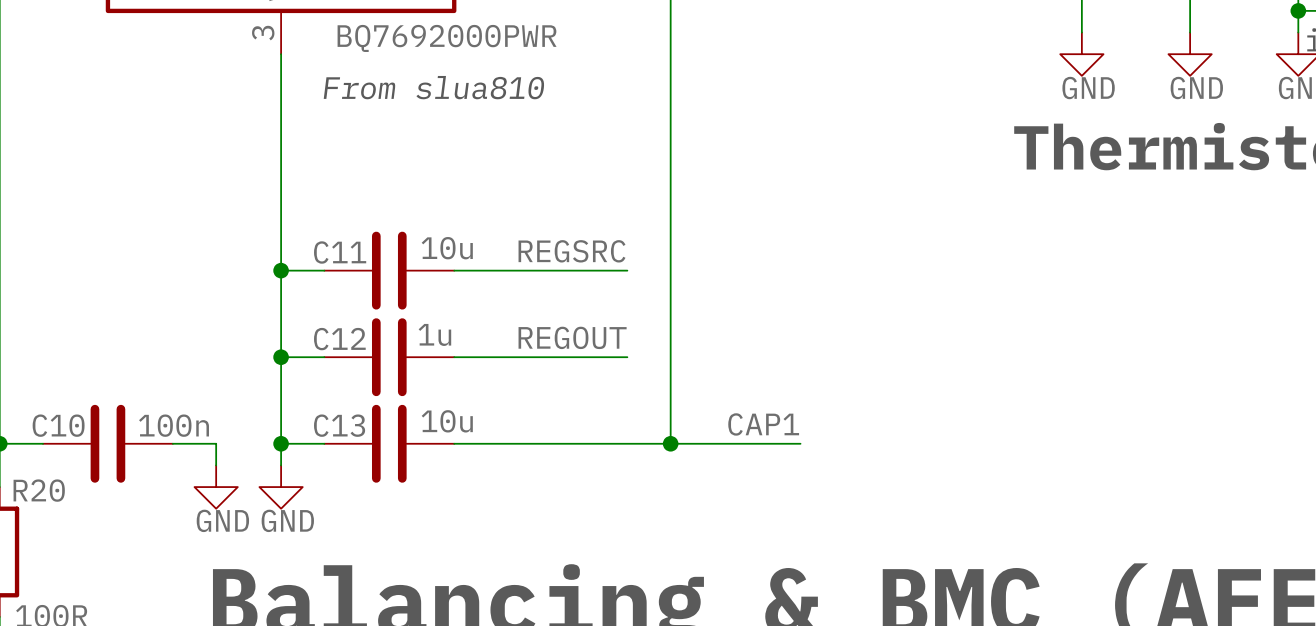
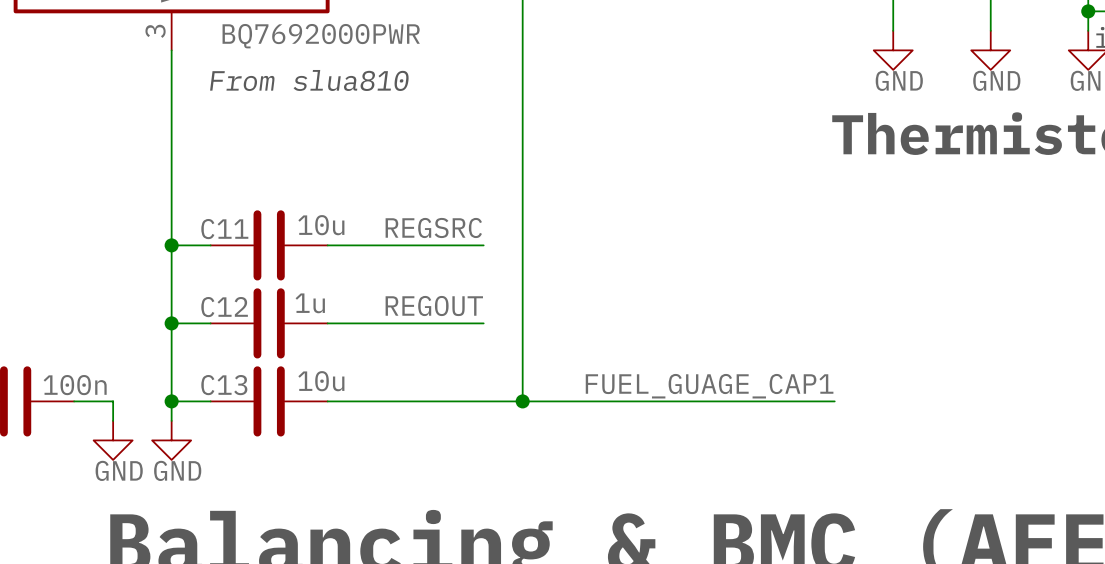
label: CAP1 (763, 424) -> none
label: none -> FUEL_GUAGE_CAP1 (709, 386)
wire: none -> (639, 401) (834, 401)

